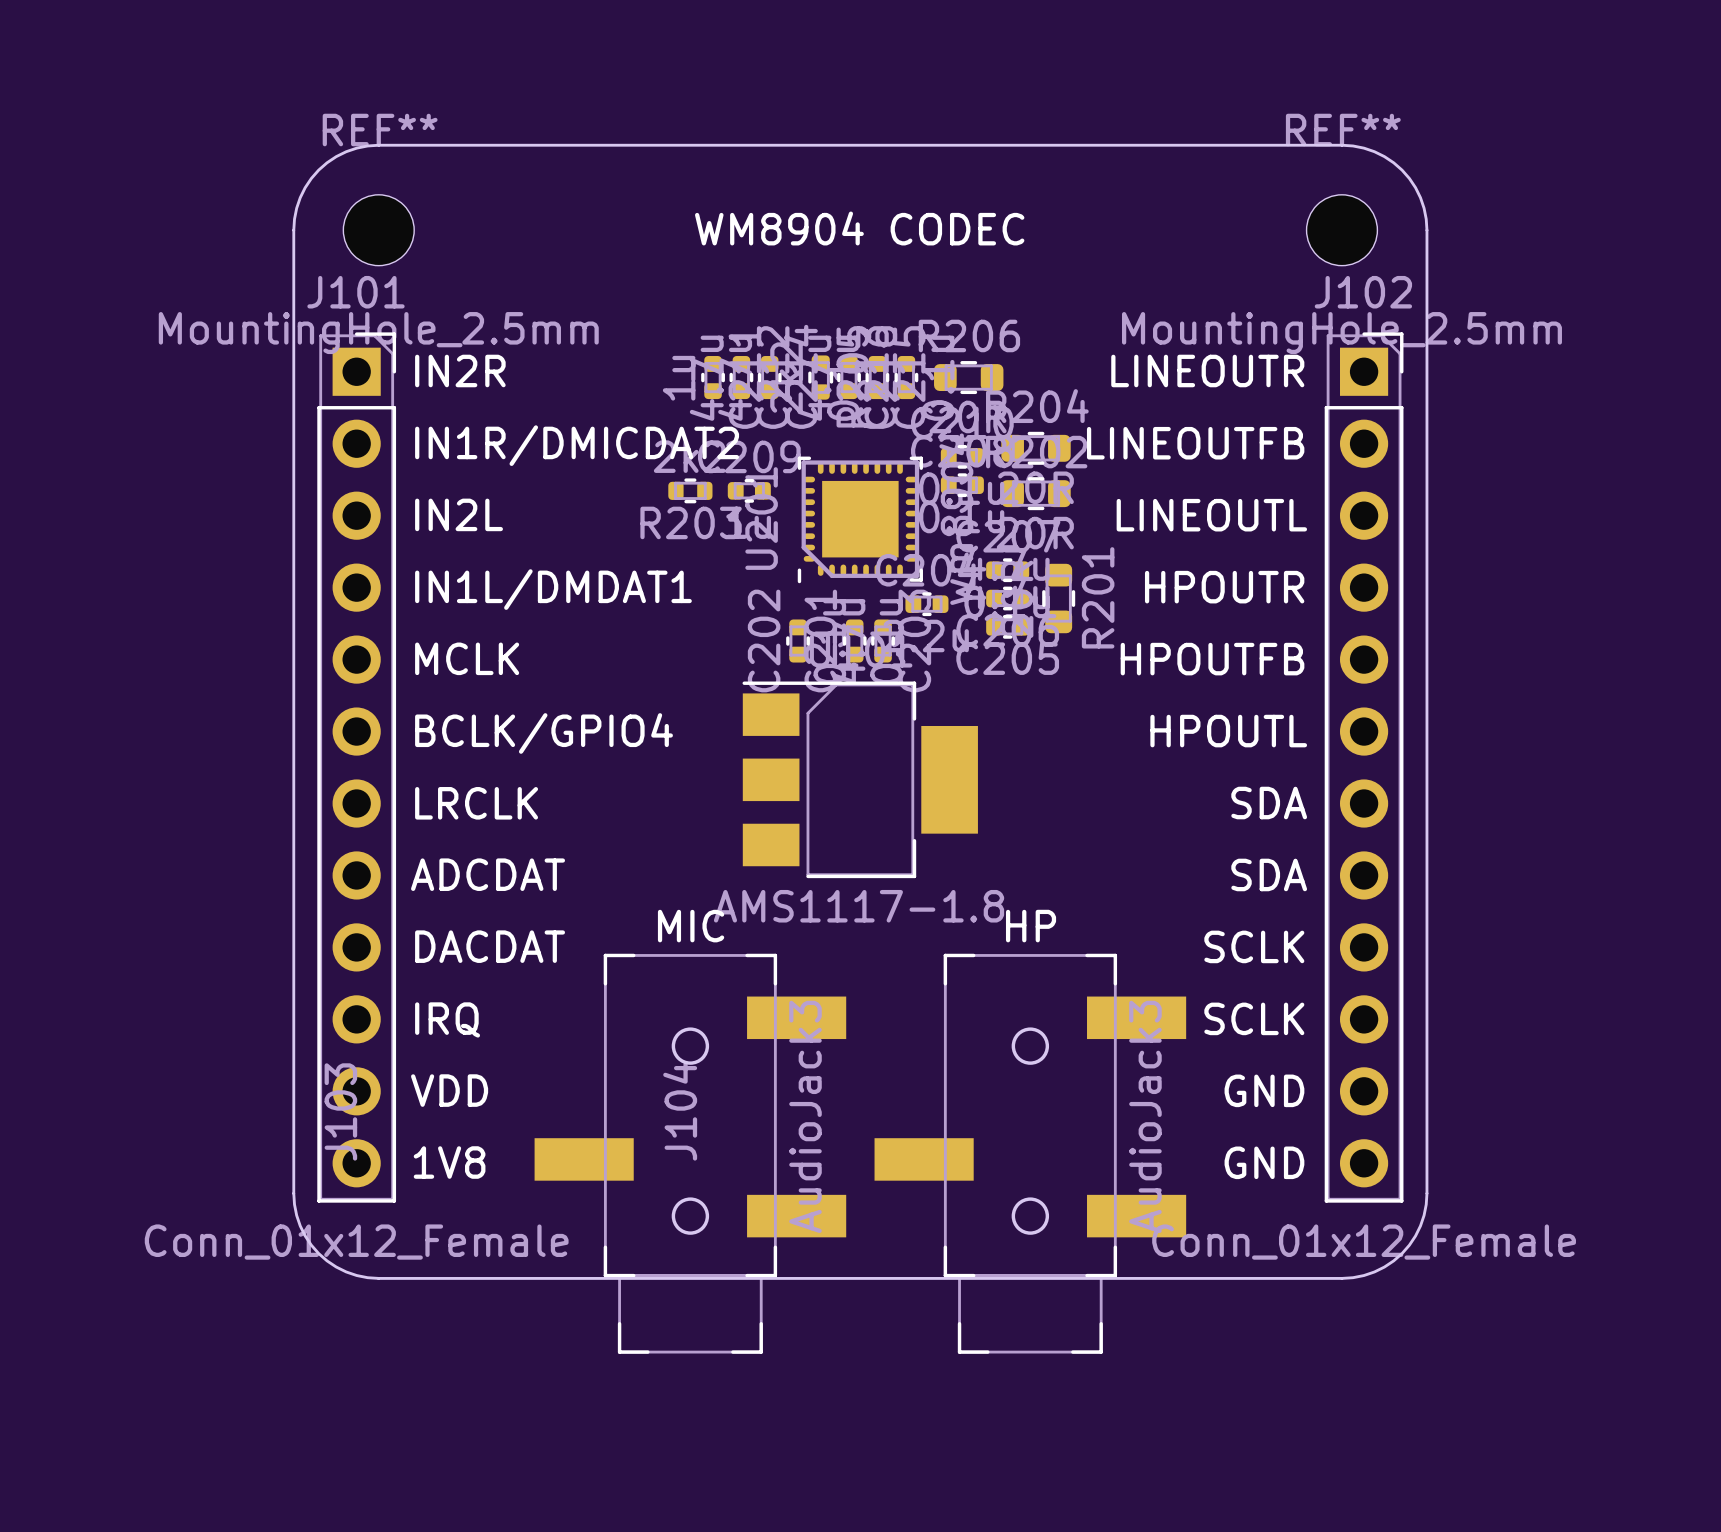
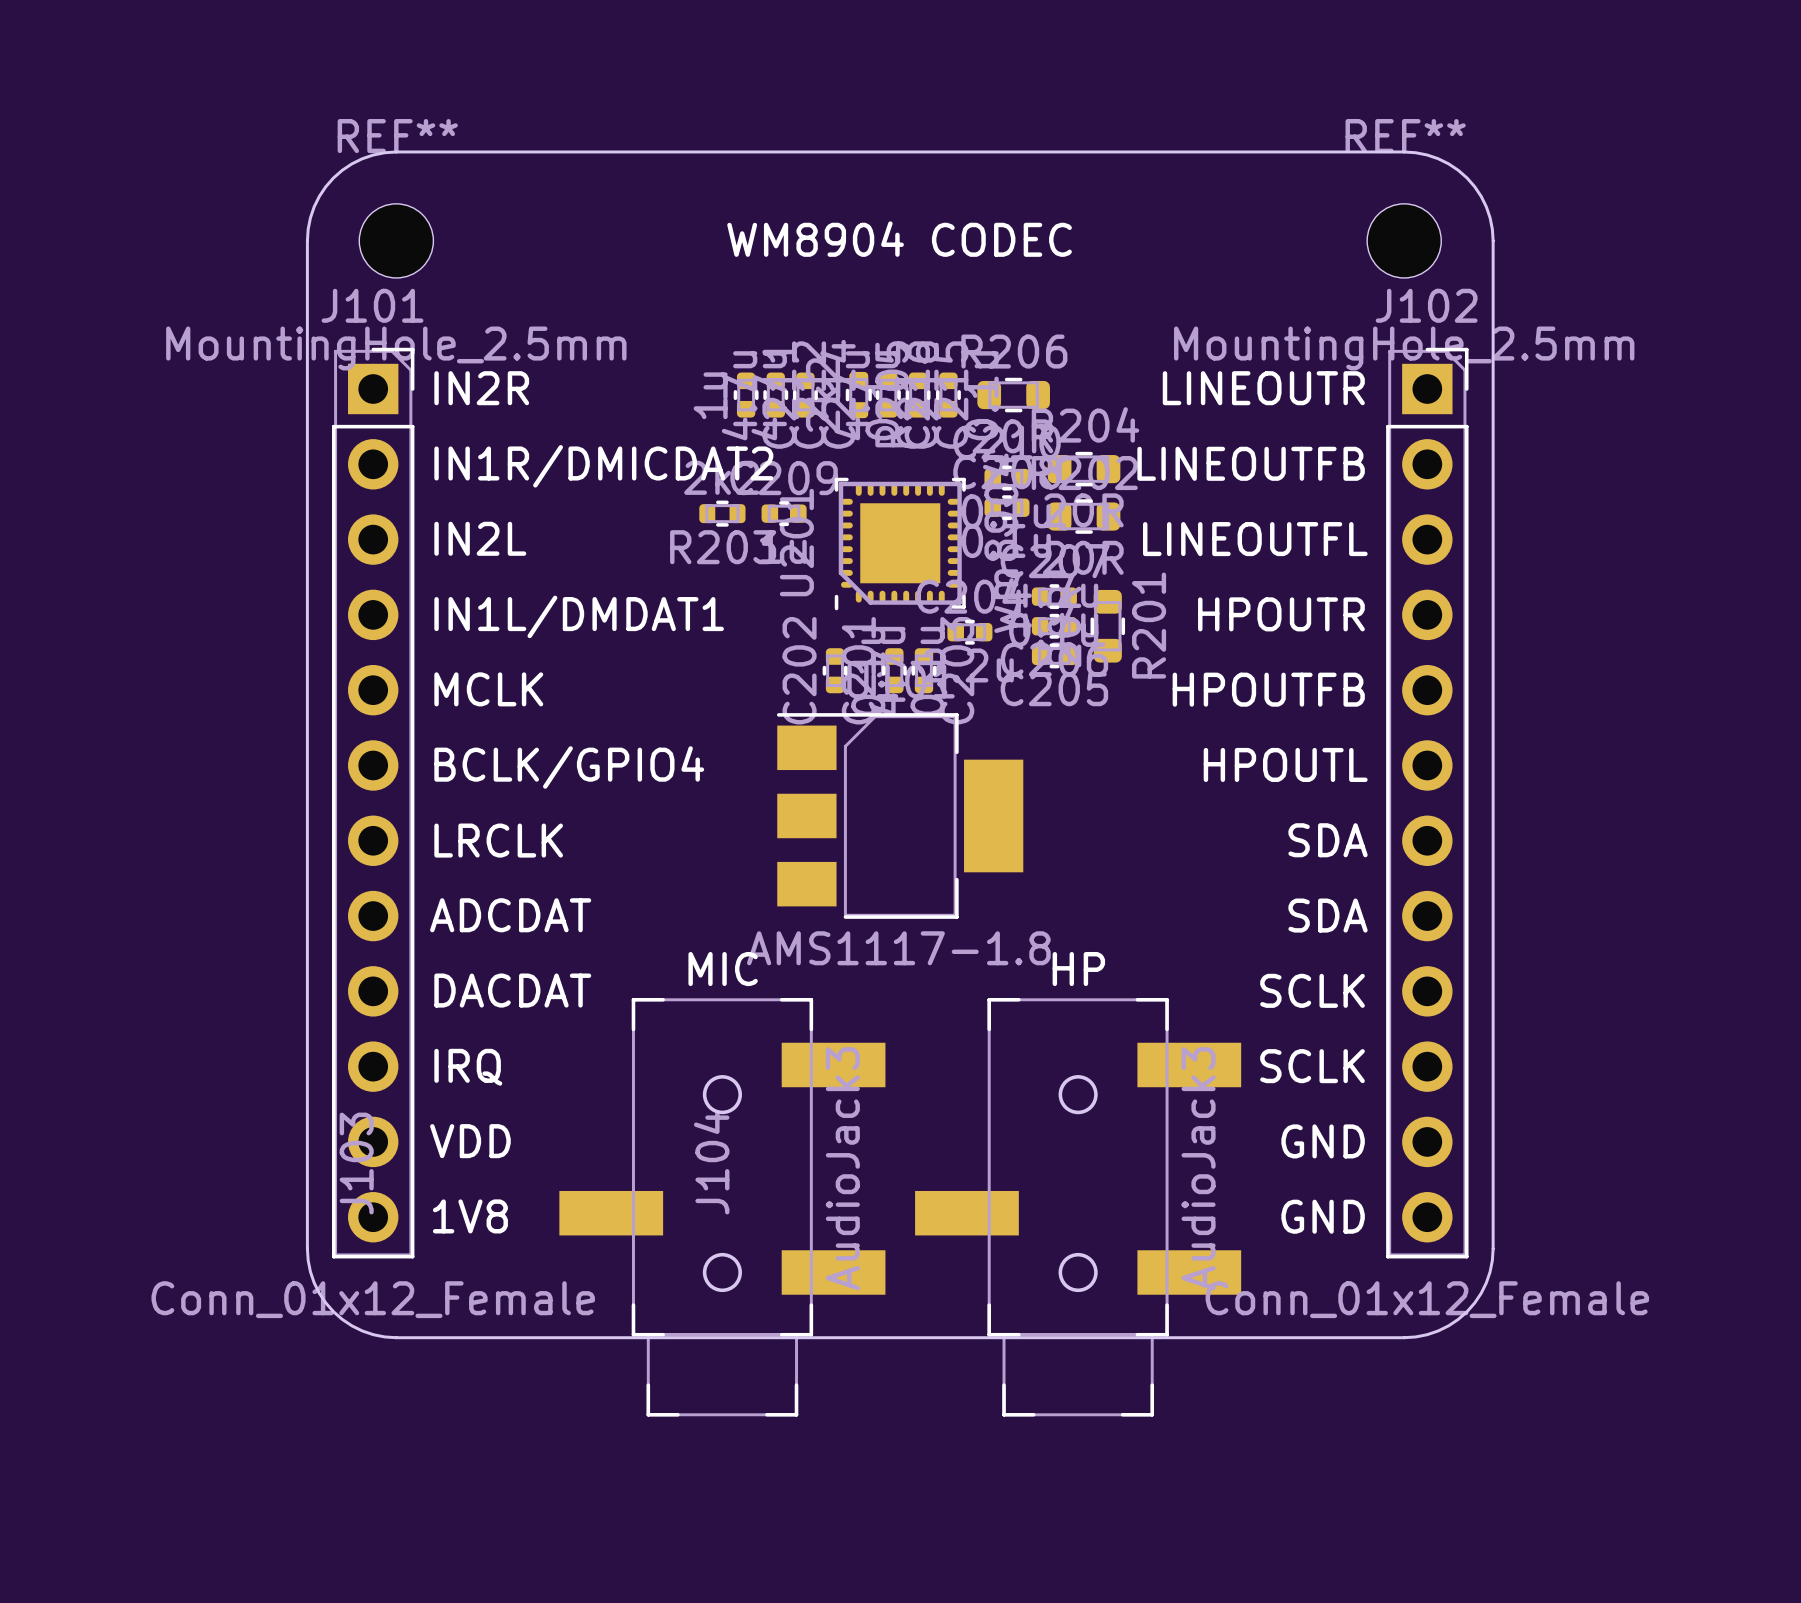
text: LINEOUTL (1211, 515) -> LINEOUTFL (1255, 539)

